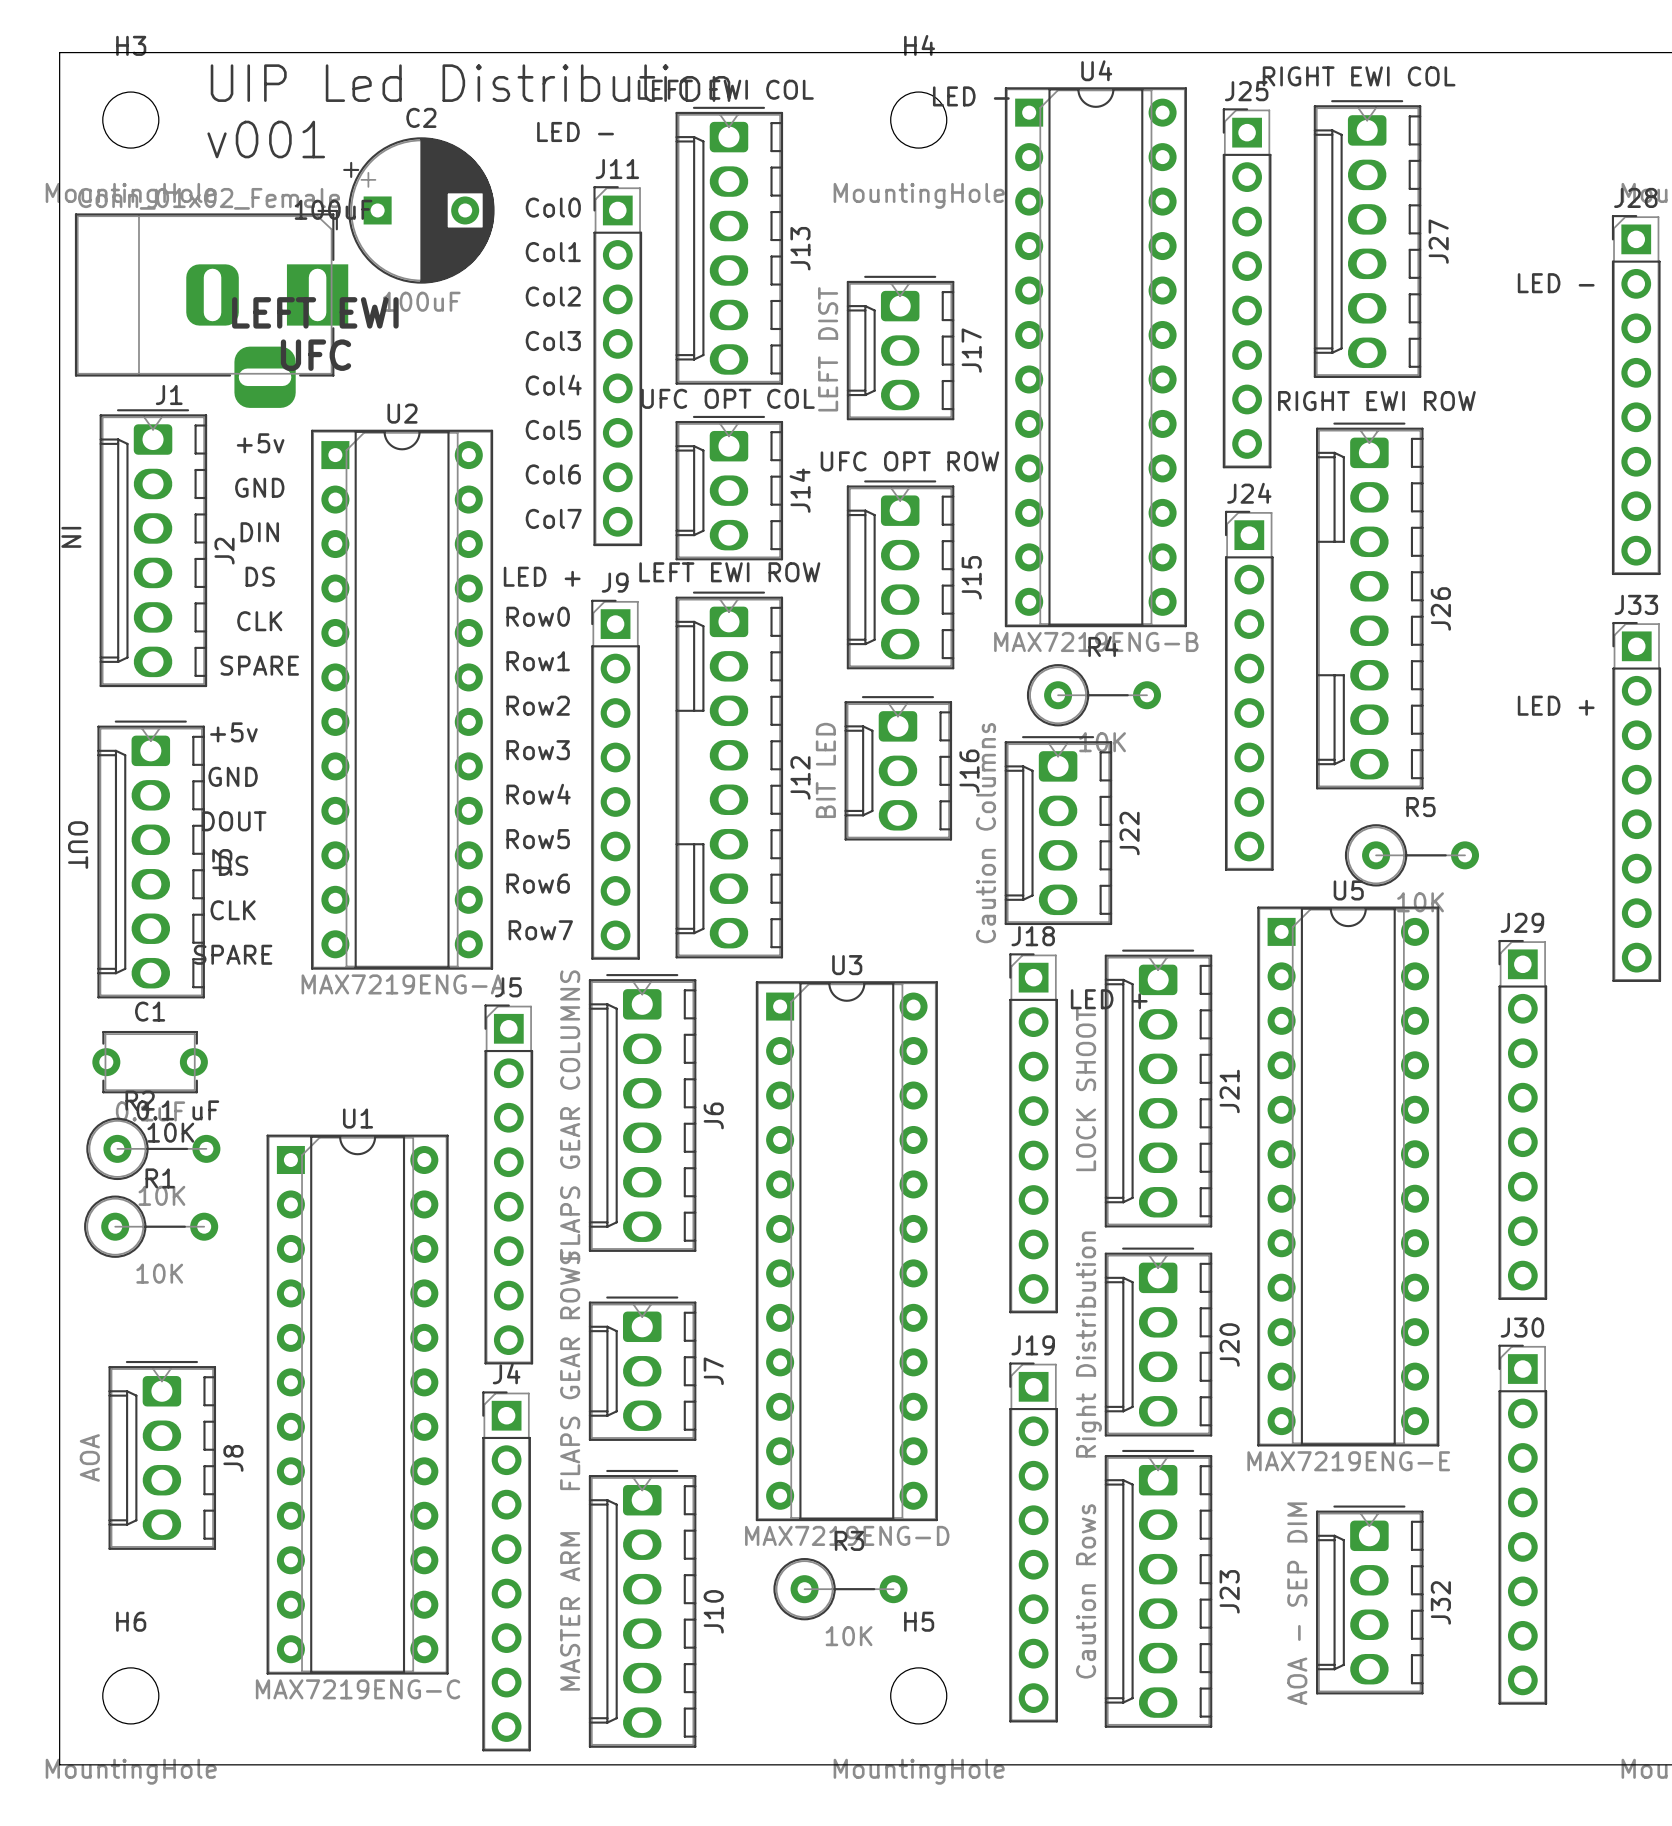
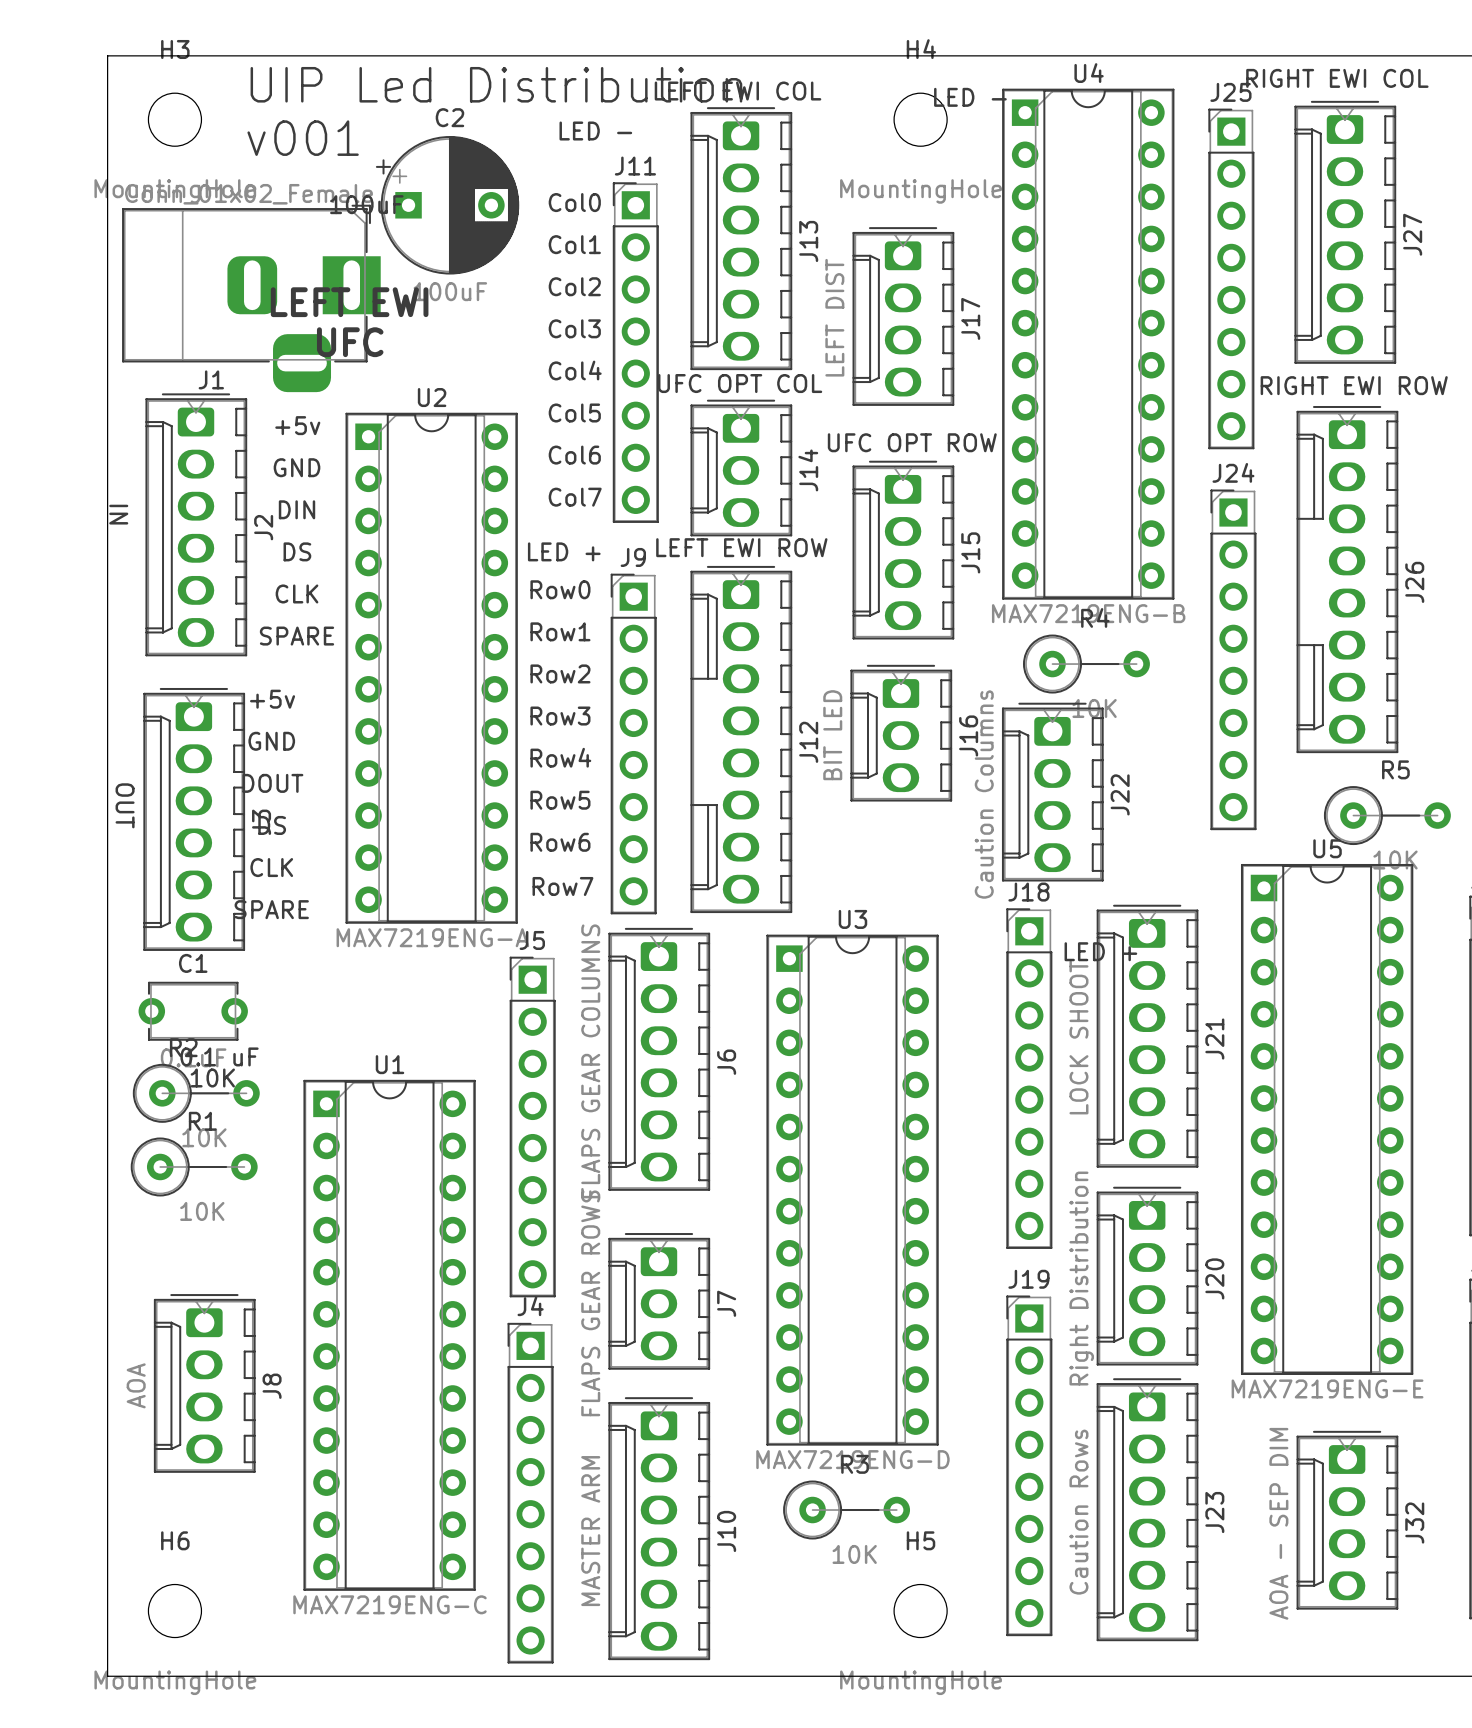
J17 footprint: [846, 275, 955, 421] -> [852, 227, 955, 406]

